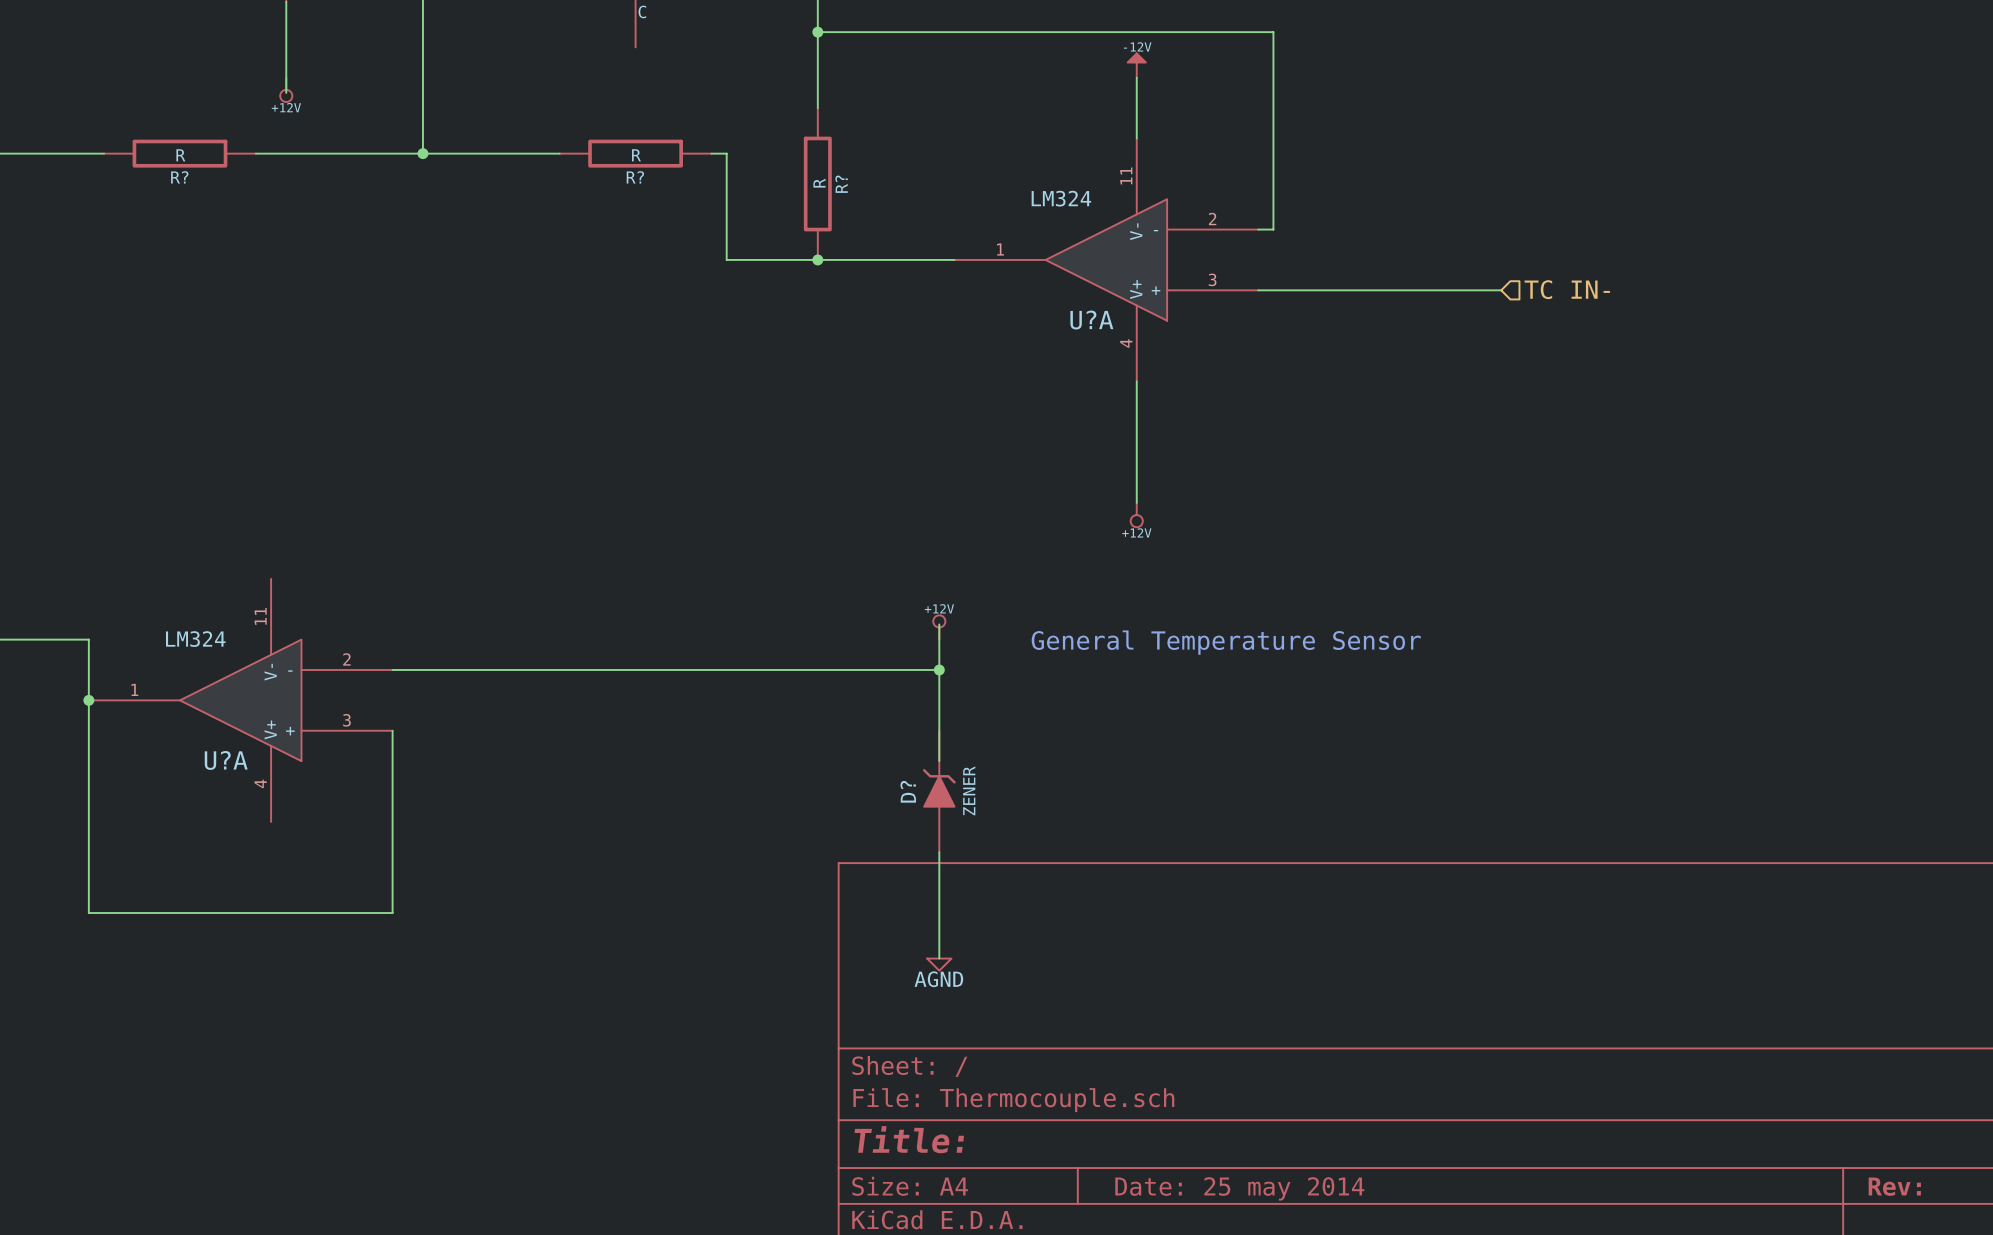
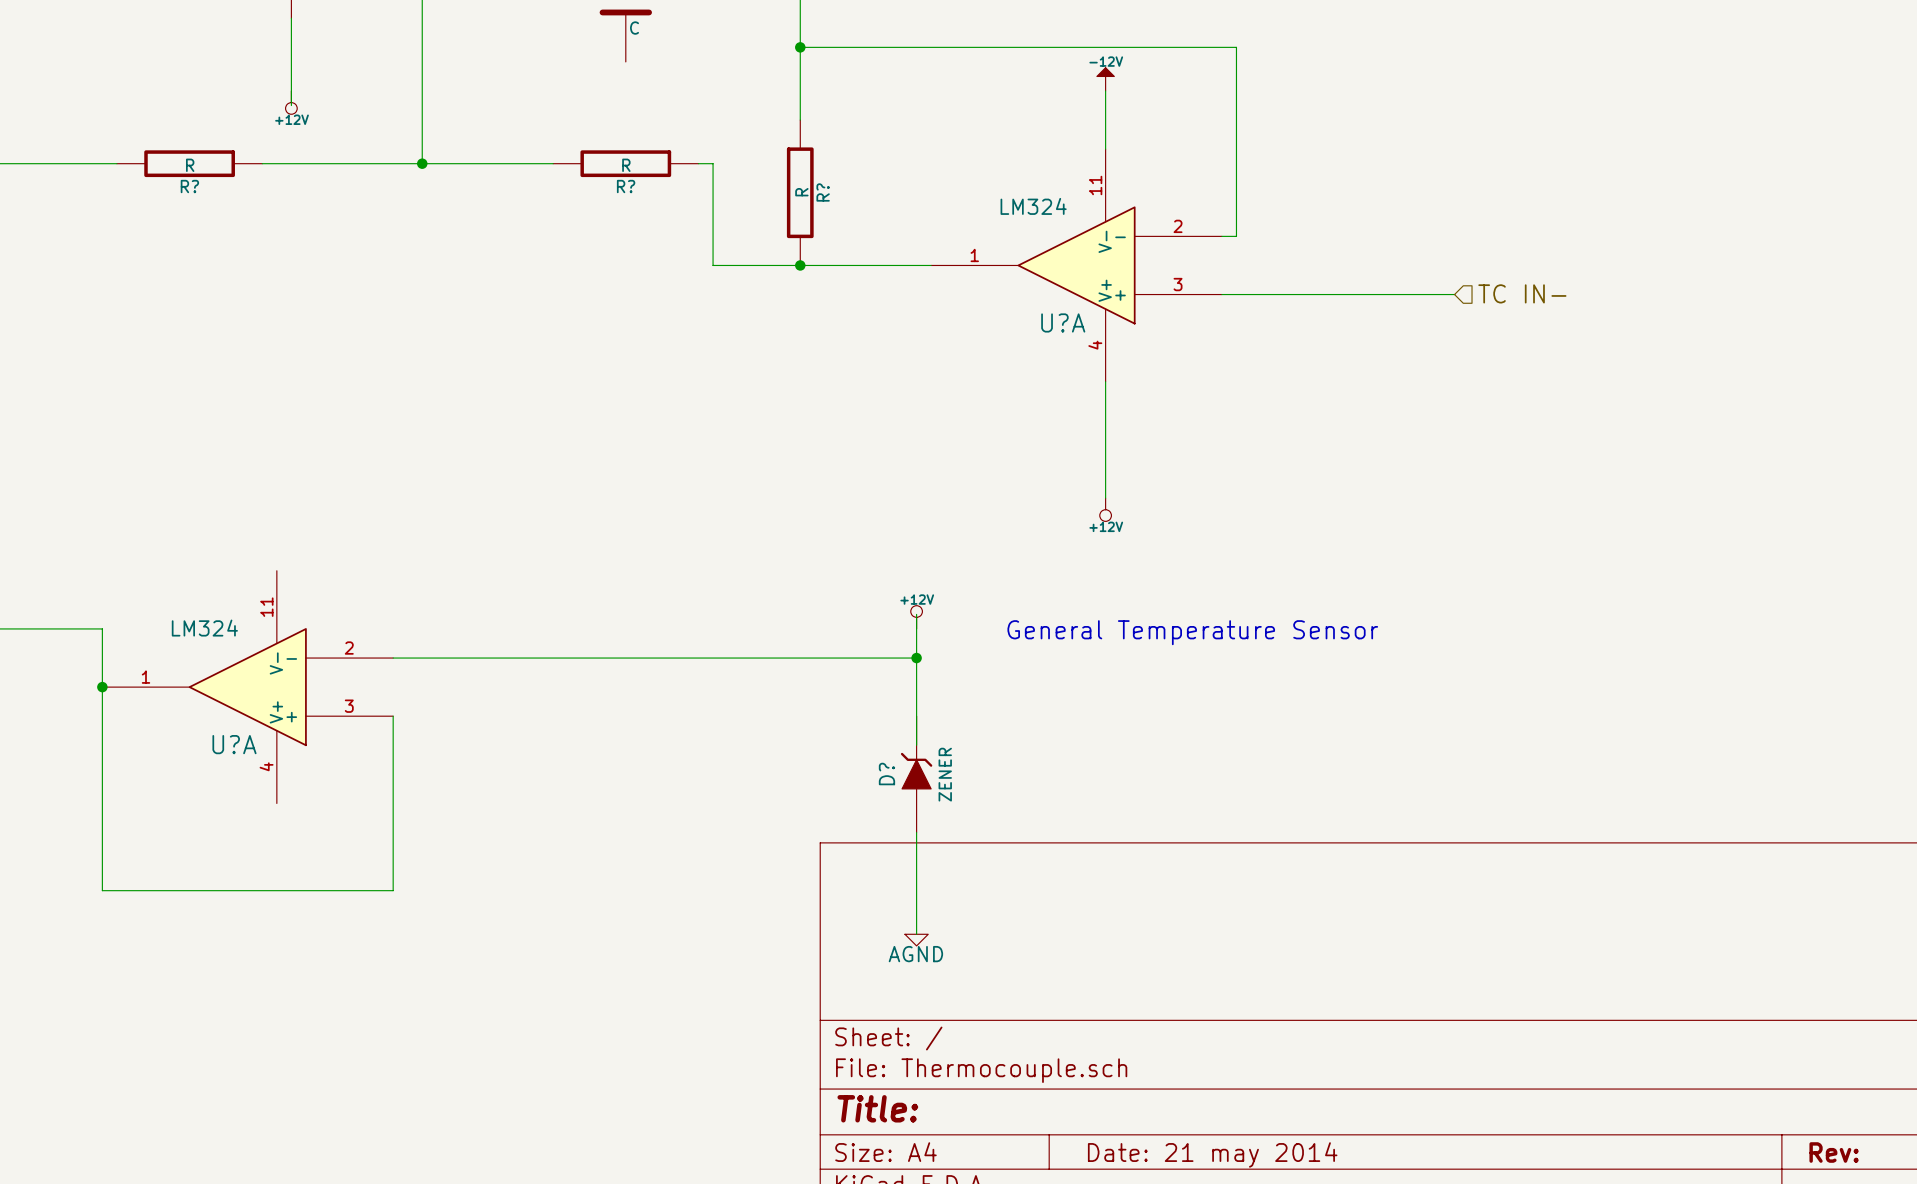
title block: Date: 25 may 2014 (1239, 1188) -> Date: 21 may 2014 (1212, 1154)

